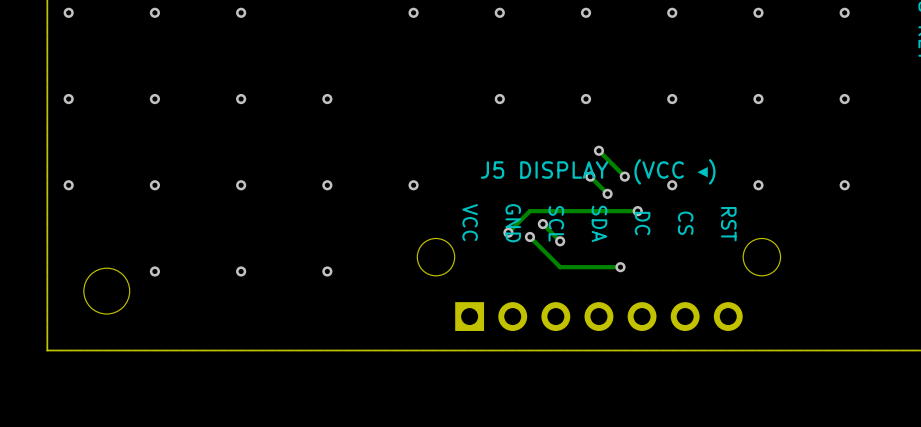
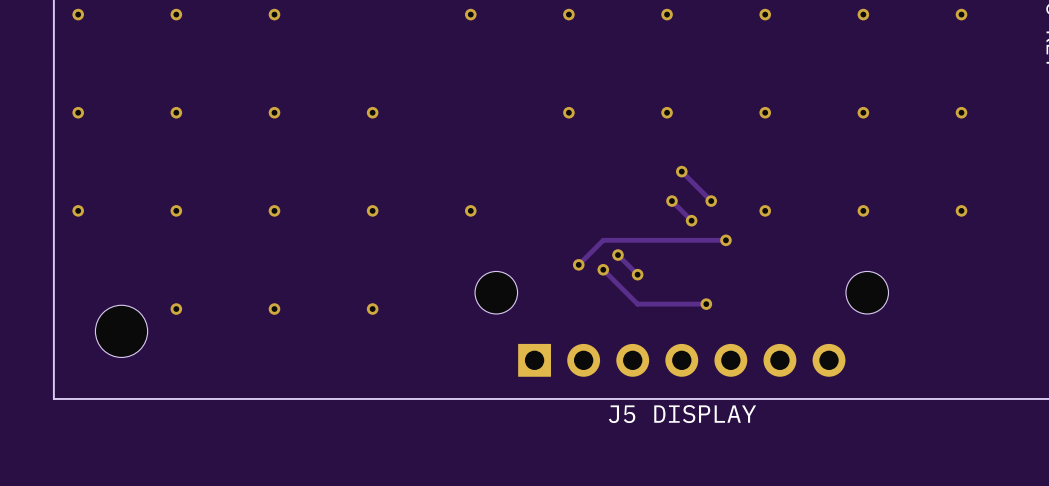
text: J5 DISPLAY (VCC ◂) (598, 171) -> none
text: VCC (470, 222) -> none
text: GND (513, 223) -> none
text: SCL (556, 223) -> none
text: SDA (599, 223) -> none
text: DC (642, 223) -> none
text: CS (685, 223) -> none
text: RST (728, 224) -> none
text: none -> J5 DISPLAY (682, 414)

